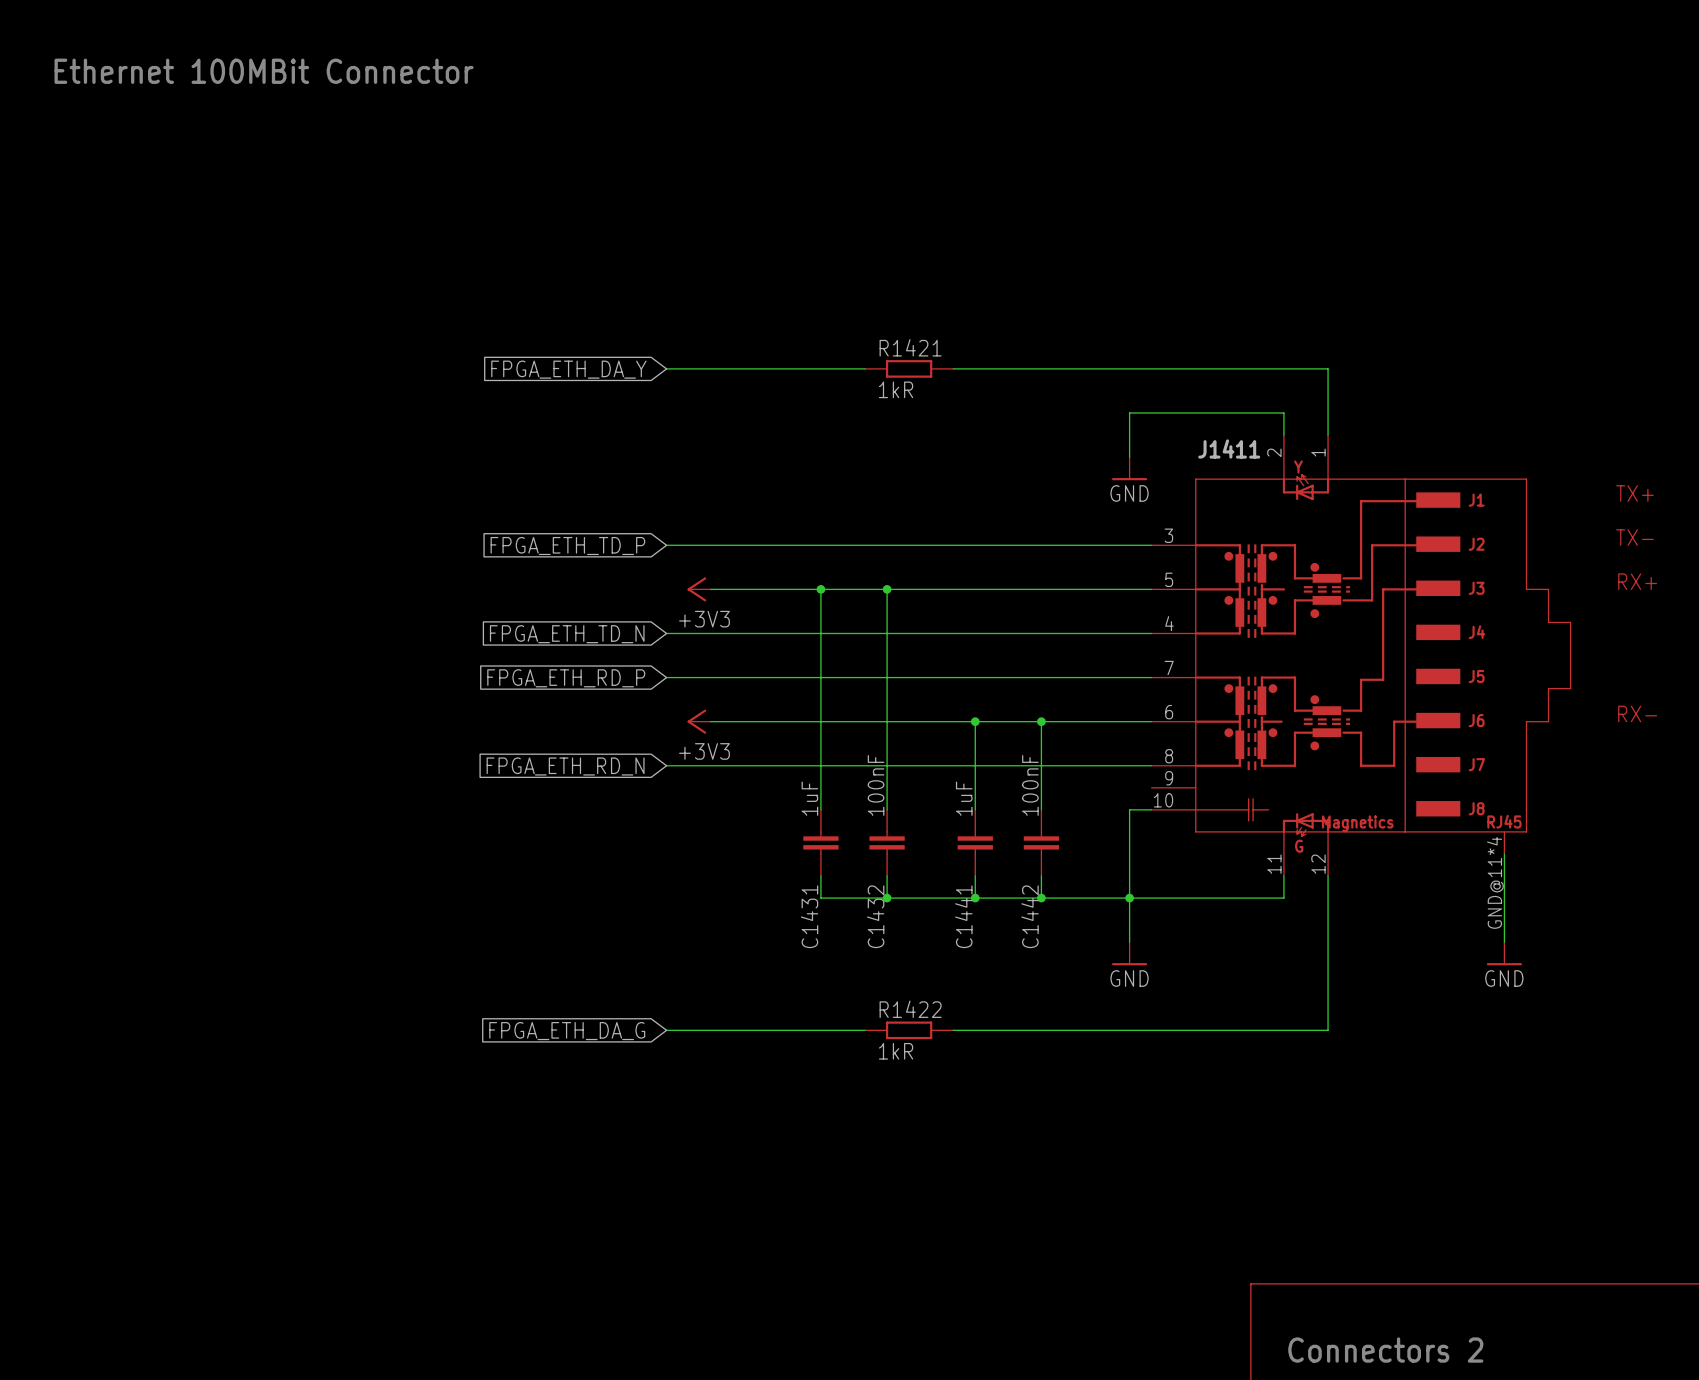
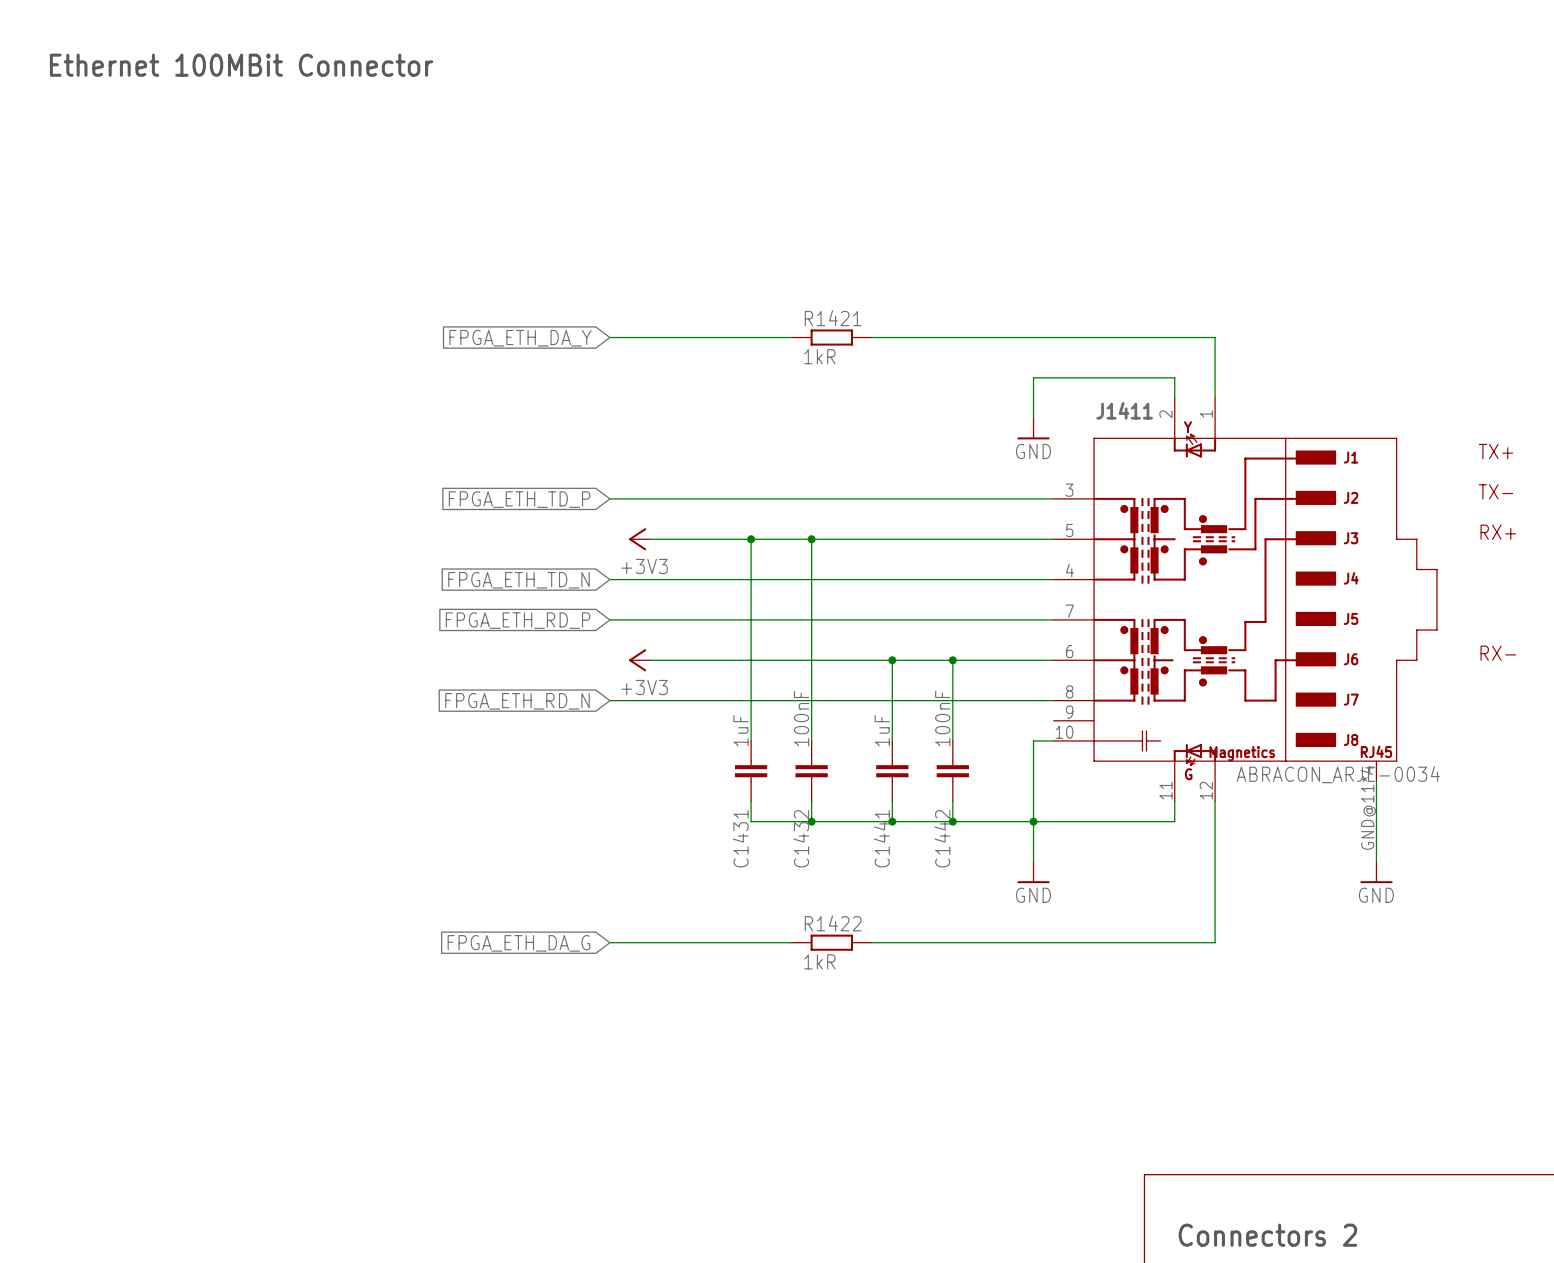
J1411 value: none -> ABRACON_ARJE-0034 (1338, 774)

